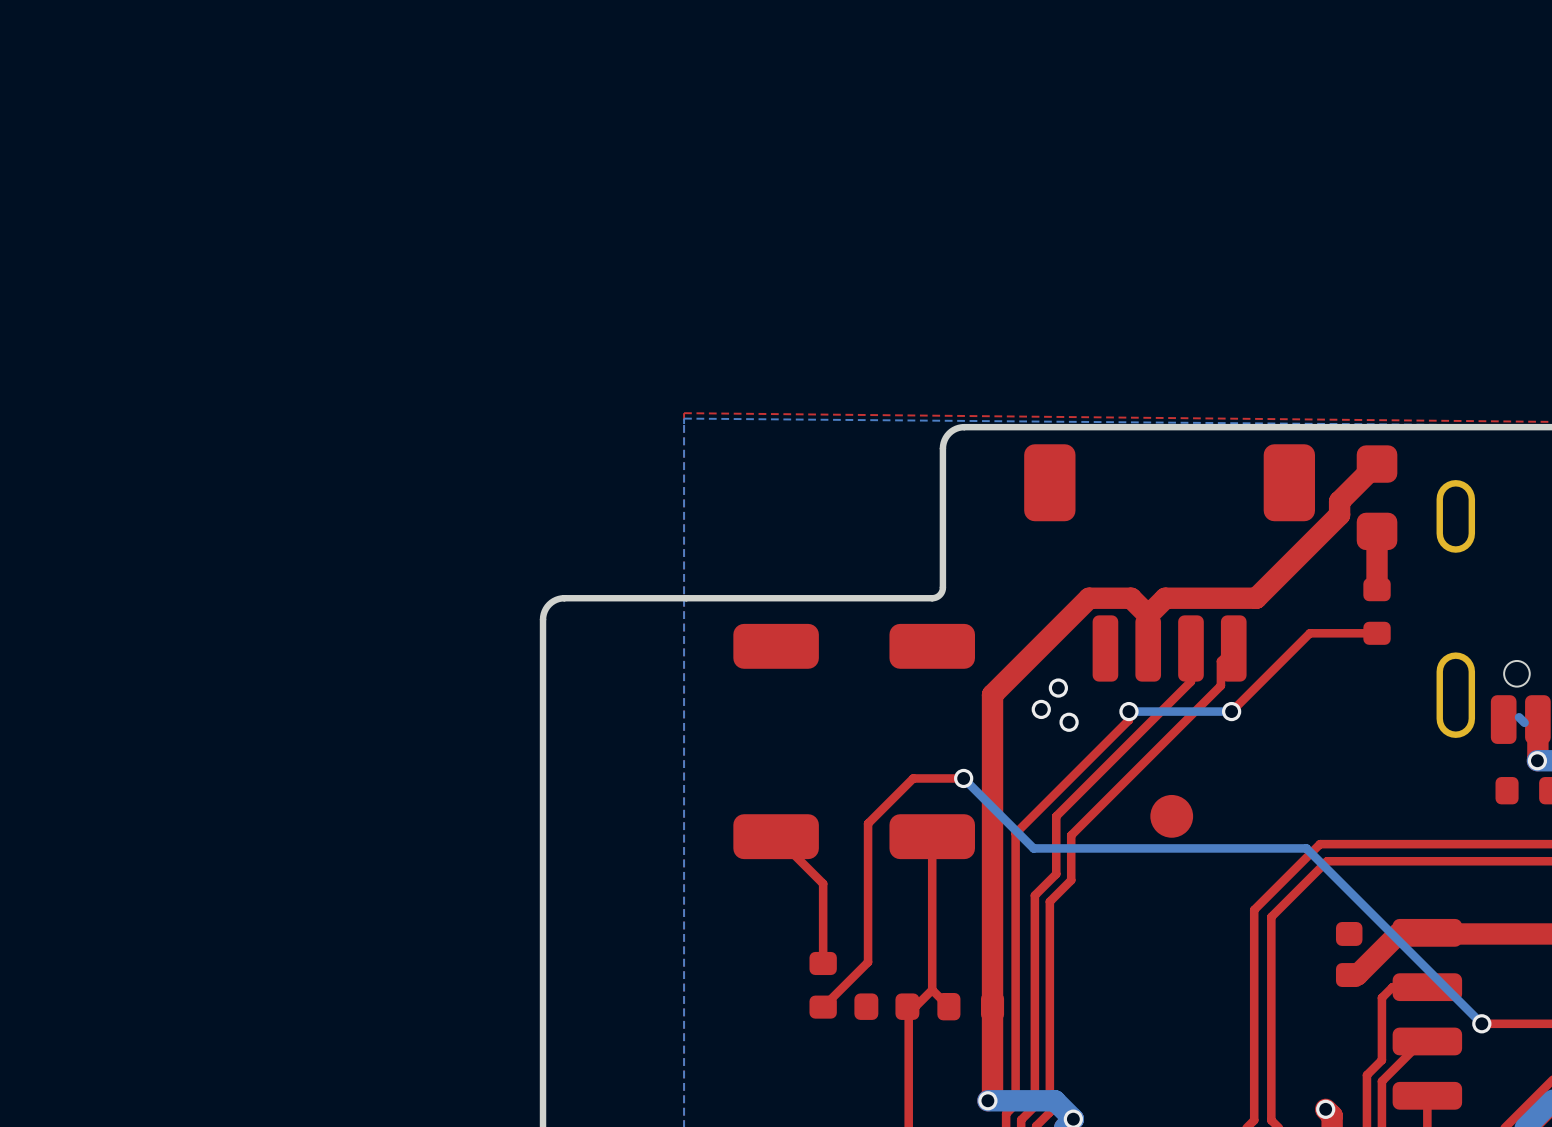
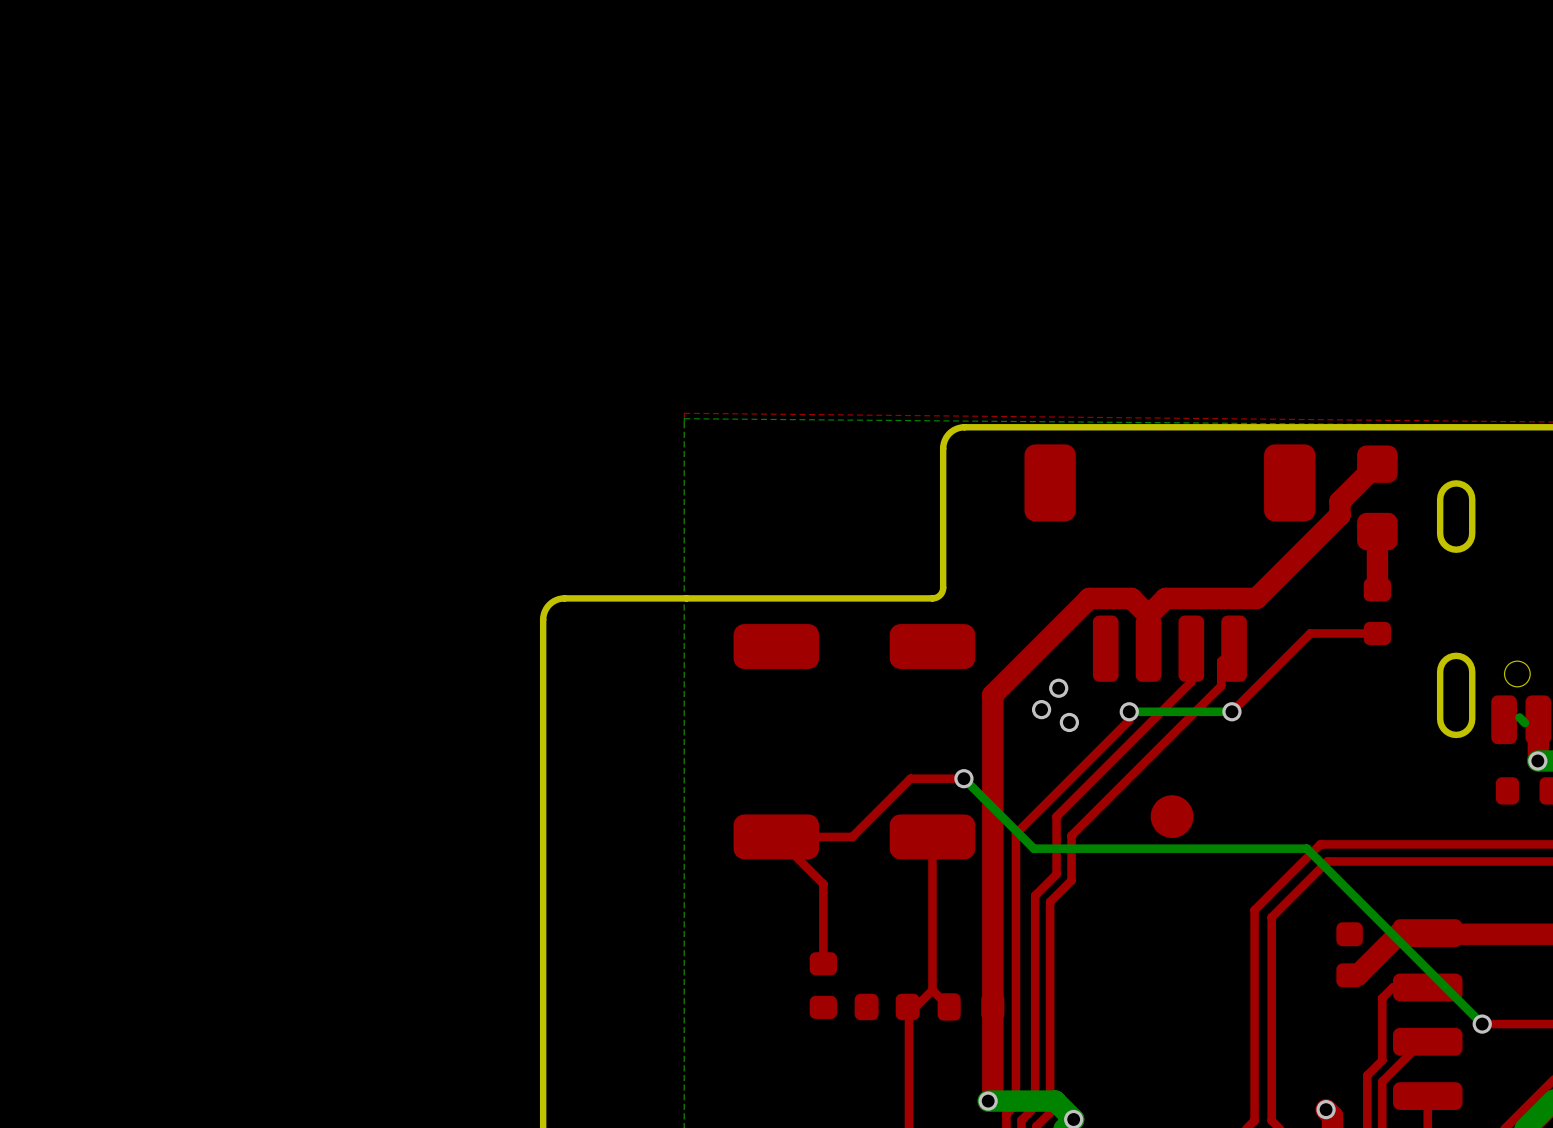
top track: (913, 778) (868, 823) (868, 962) (823, 1007) -> (913, 778) (910, 778) (852, 836) (776, 836)

